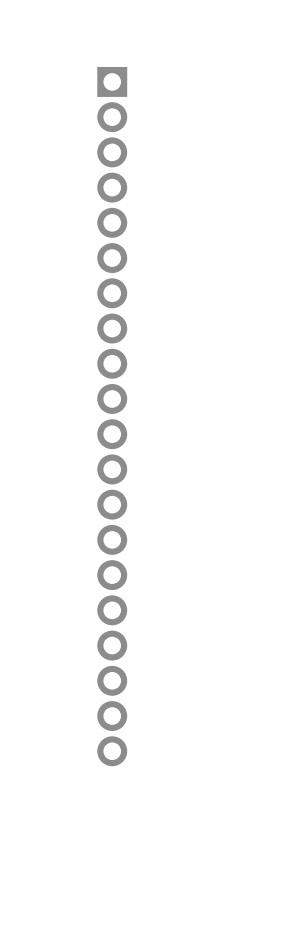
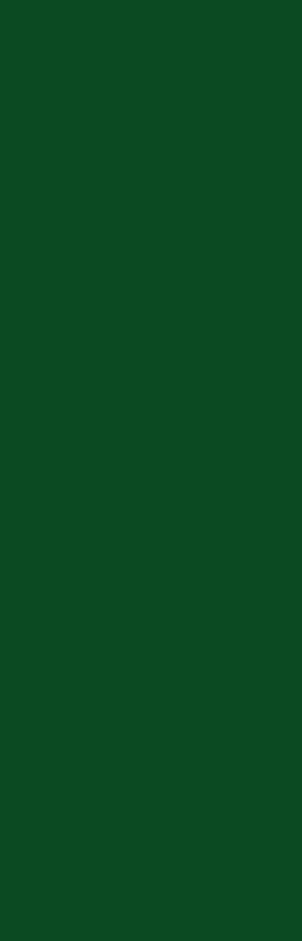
part: (112, 416) -> none

